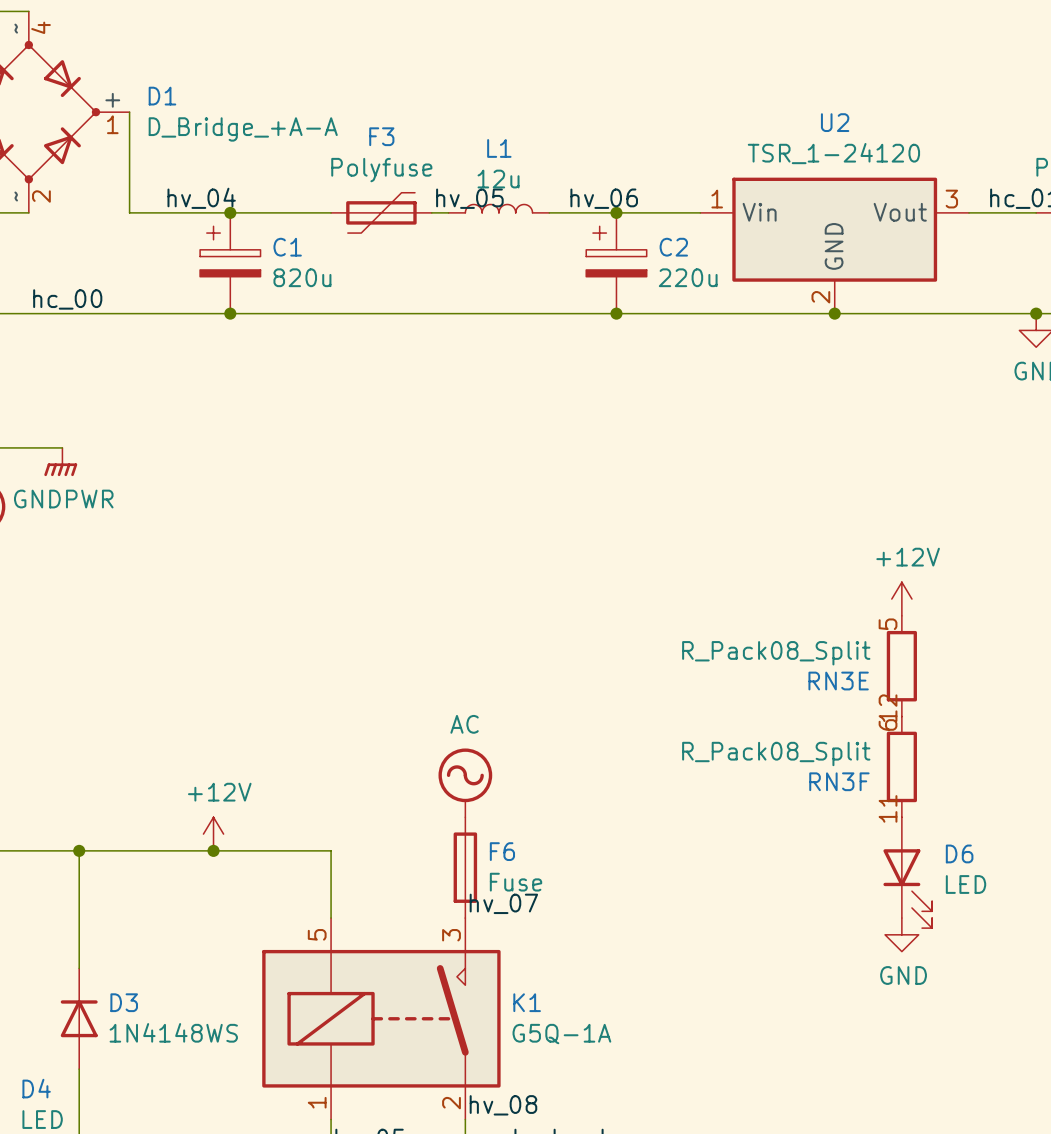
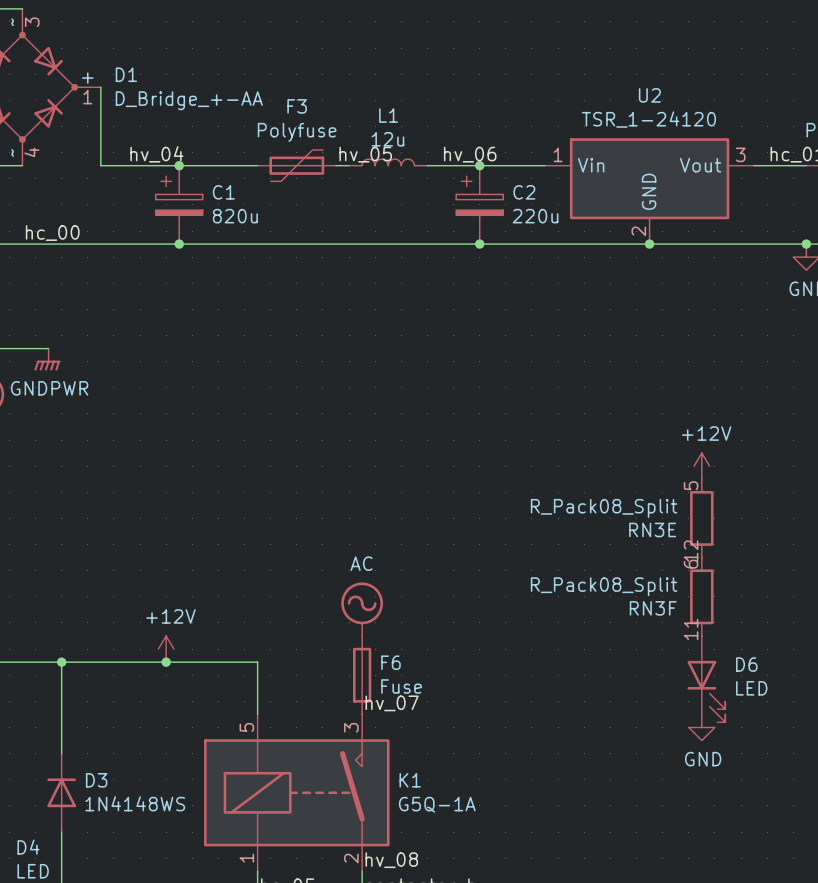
D1 pin number: 4 (41, 27) -> 3 (32, 22)
D1 value: D_Bridge_+A-A (243, 129) -> D_Bridge_+-AA (189, 100)
D1 pin number: 2 (41, 196) -> 4 (31, 152)

